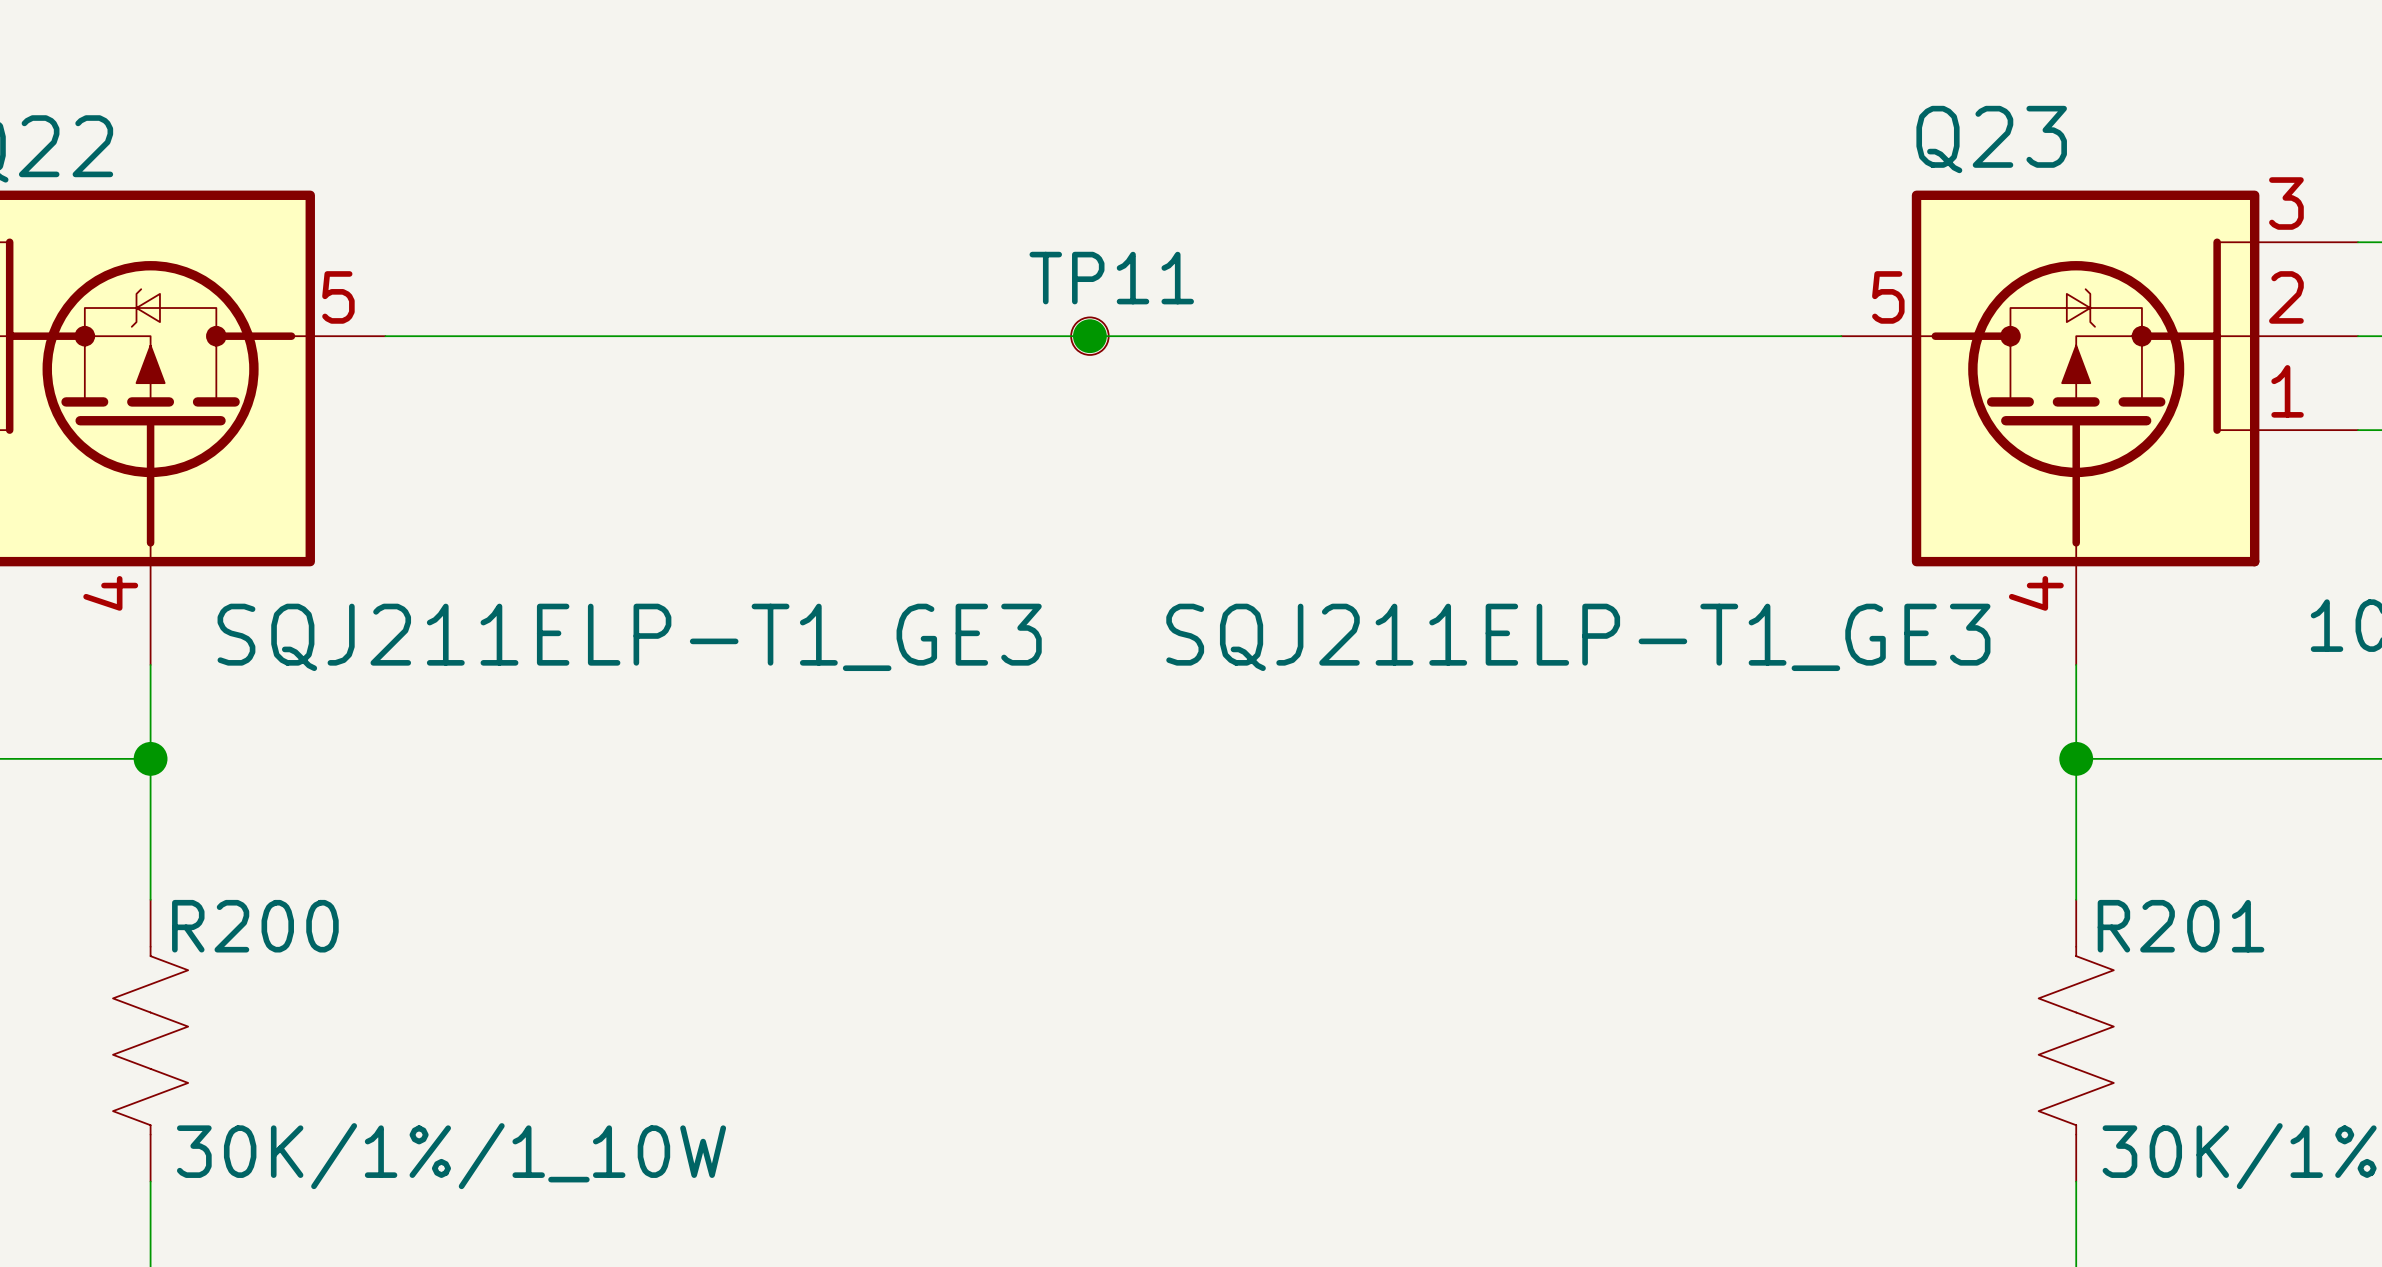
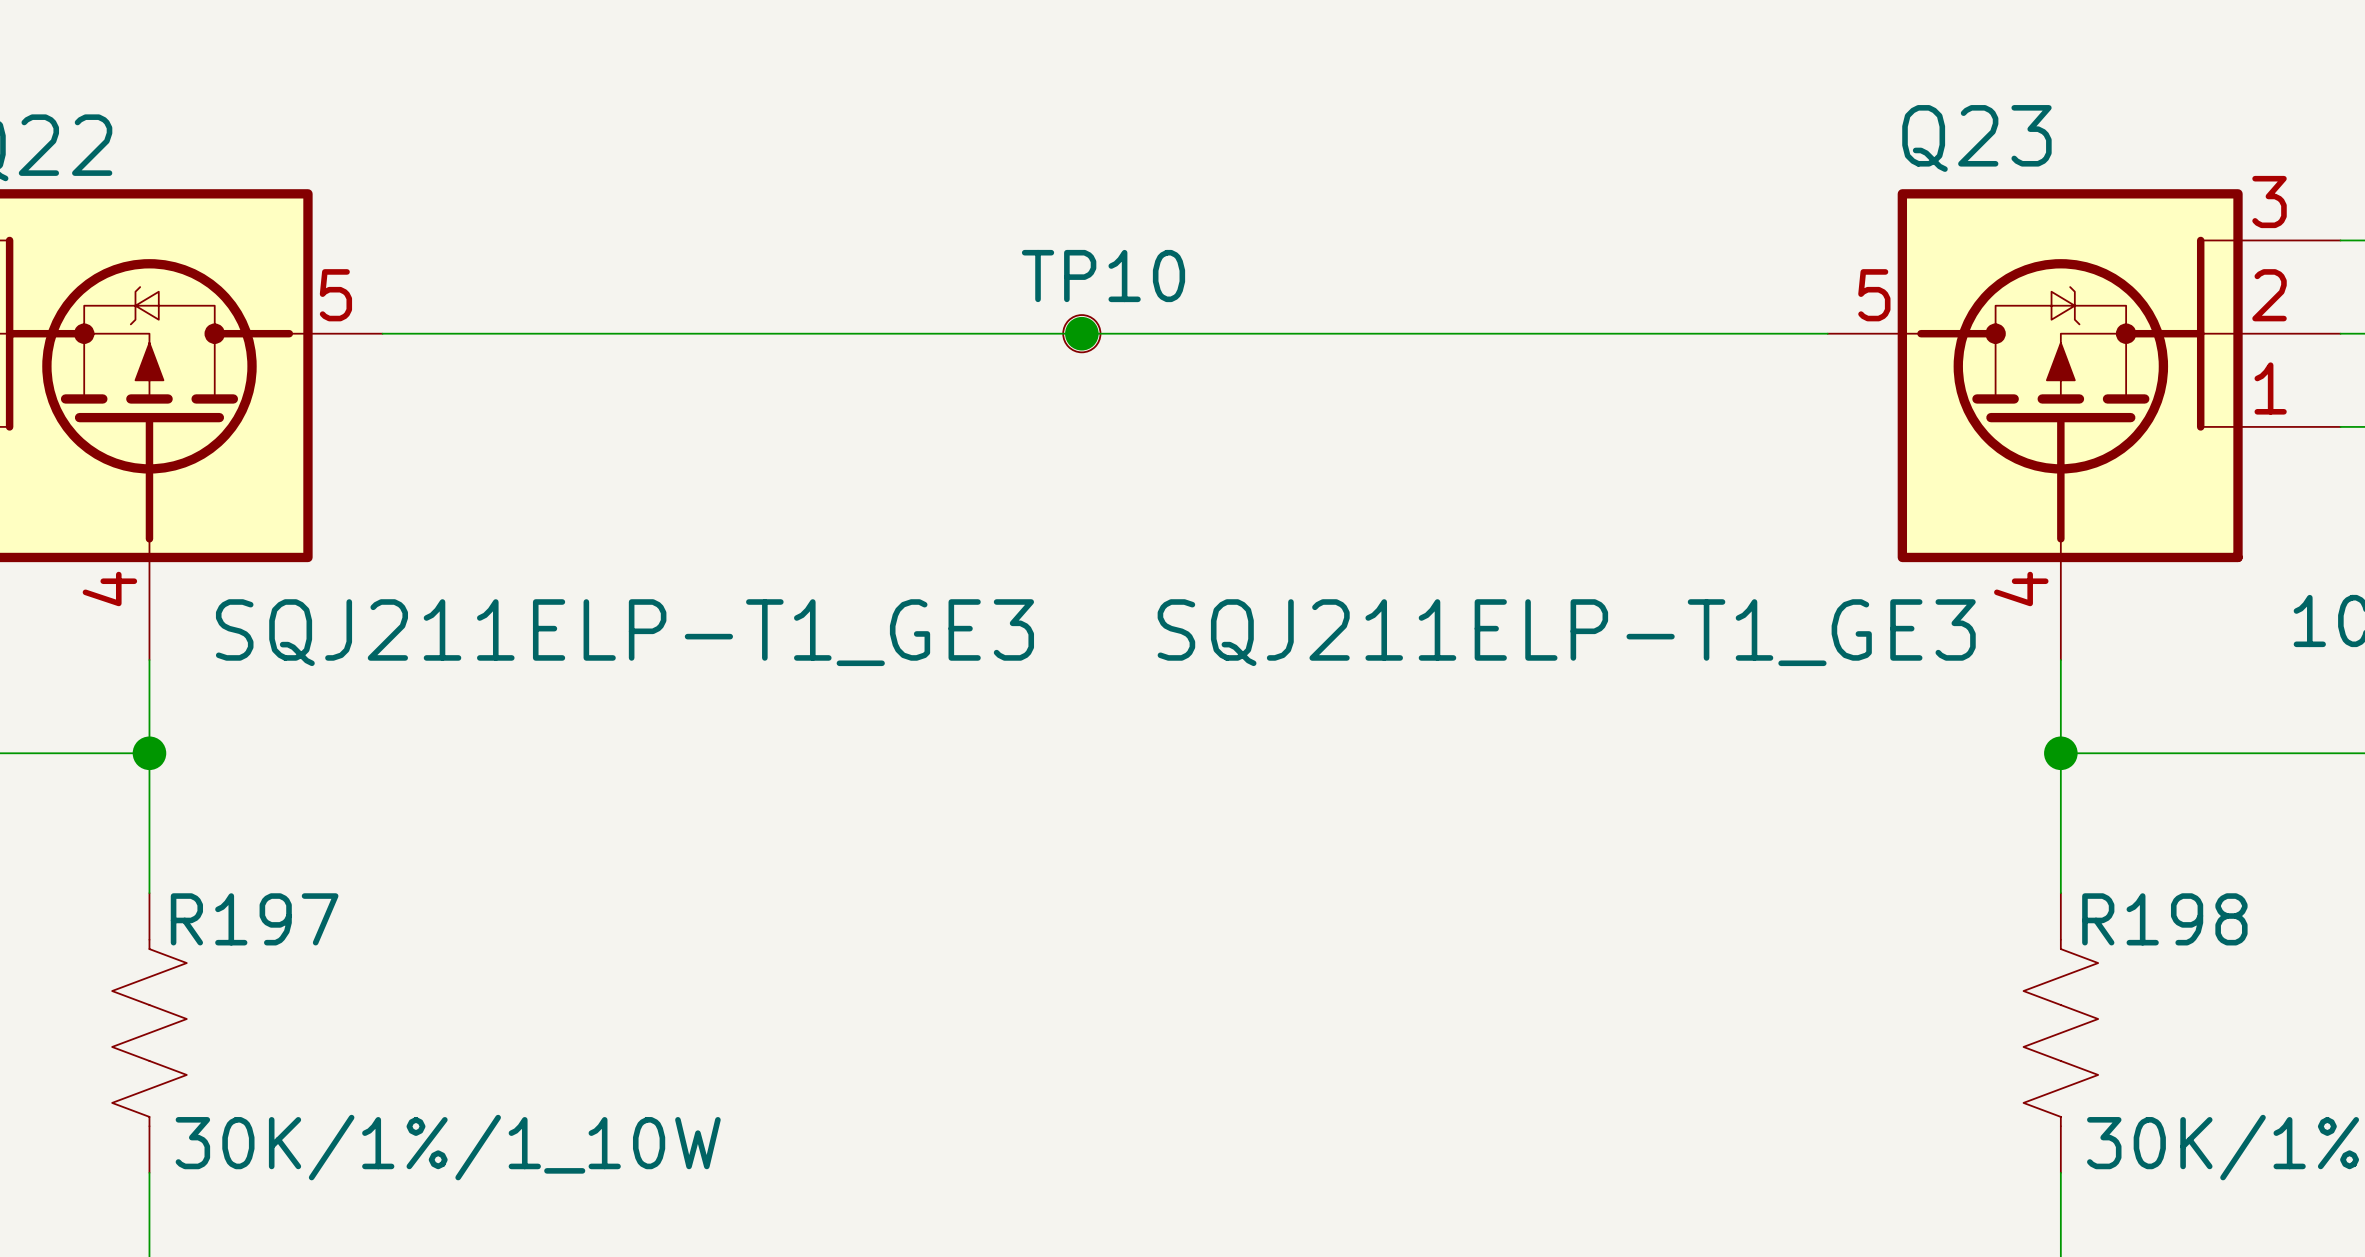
TP11 name: TP11 (1111, 278) -> TP10 (1103, 276)
R200 name: R200 (255, 926) -> R197 (254, 919)
R201 name: R201 (2181, 926) -> R198 (2164, 919)

